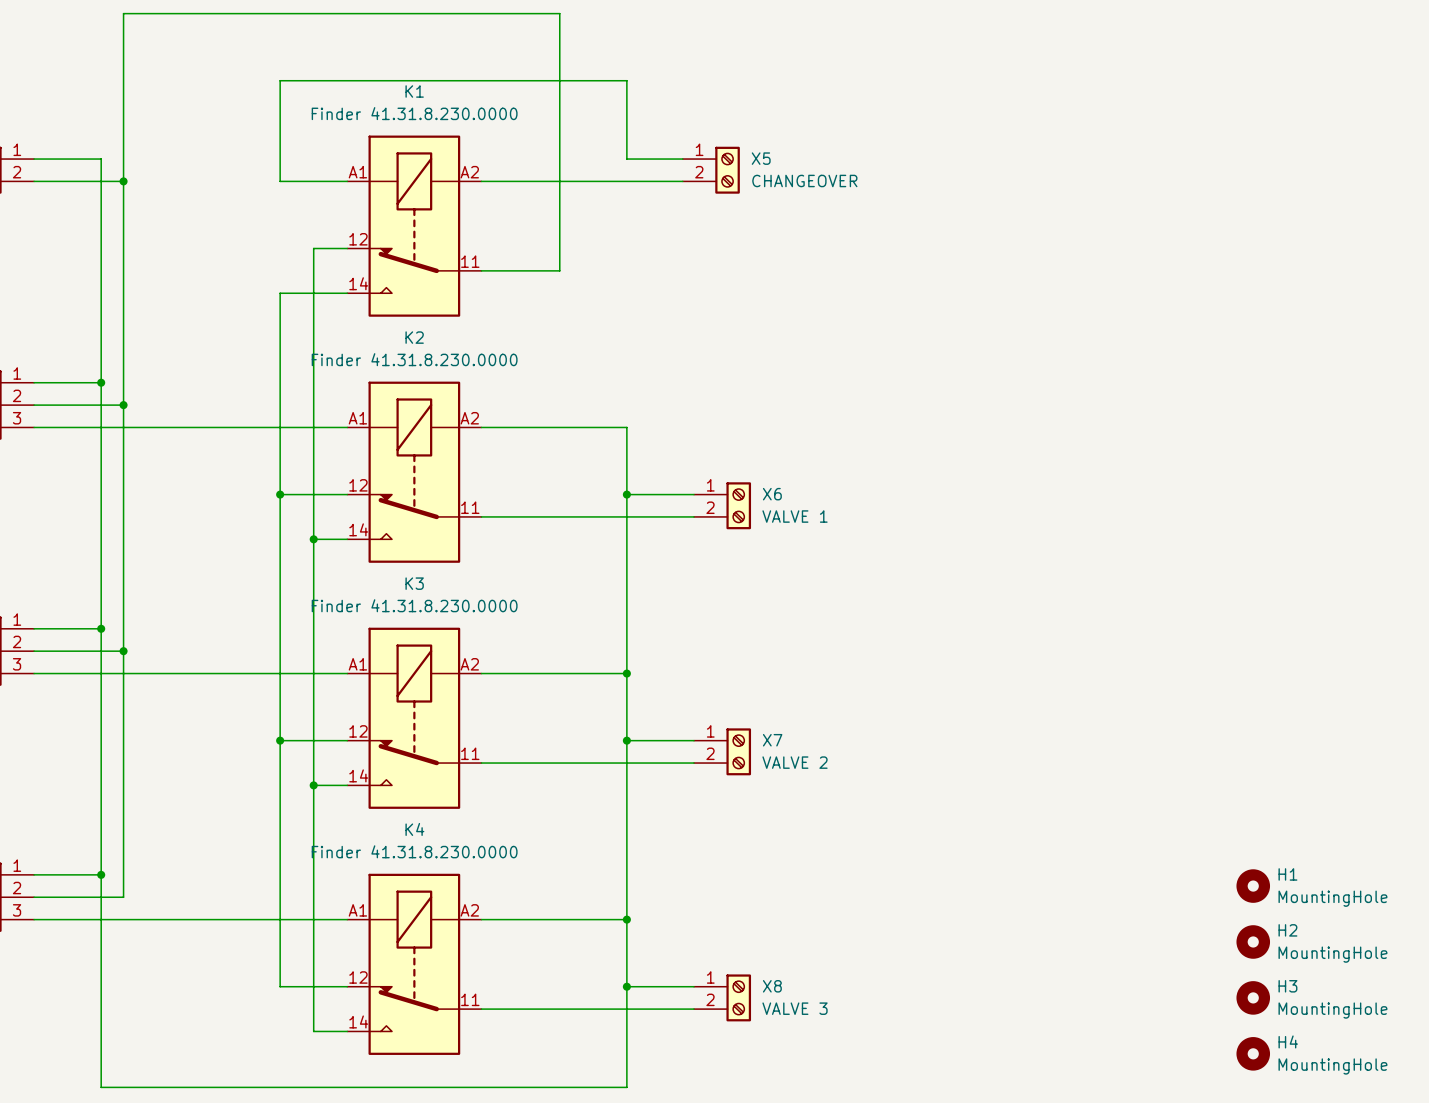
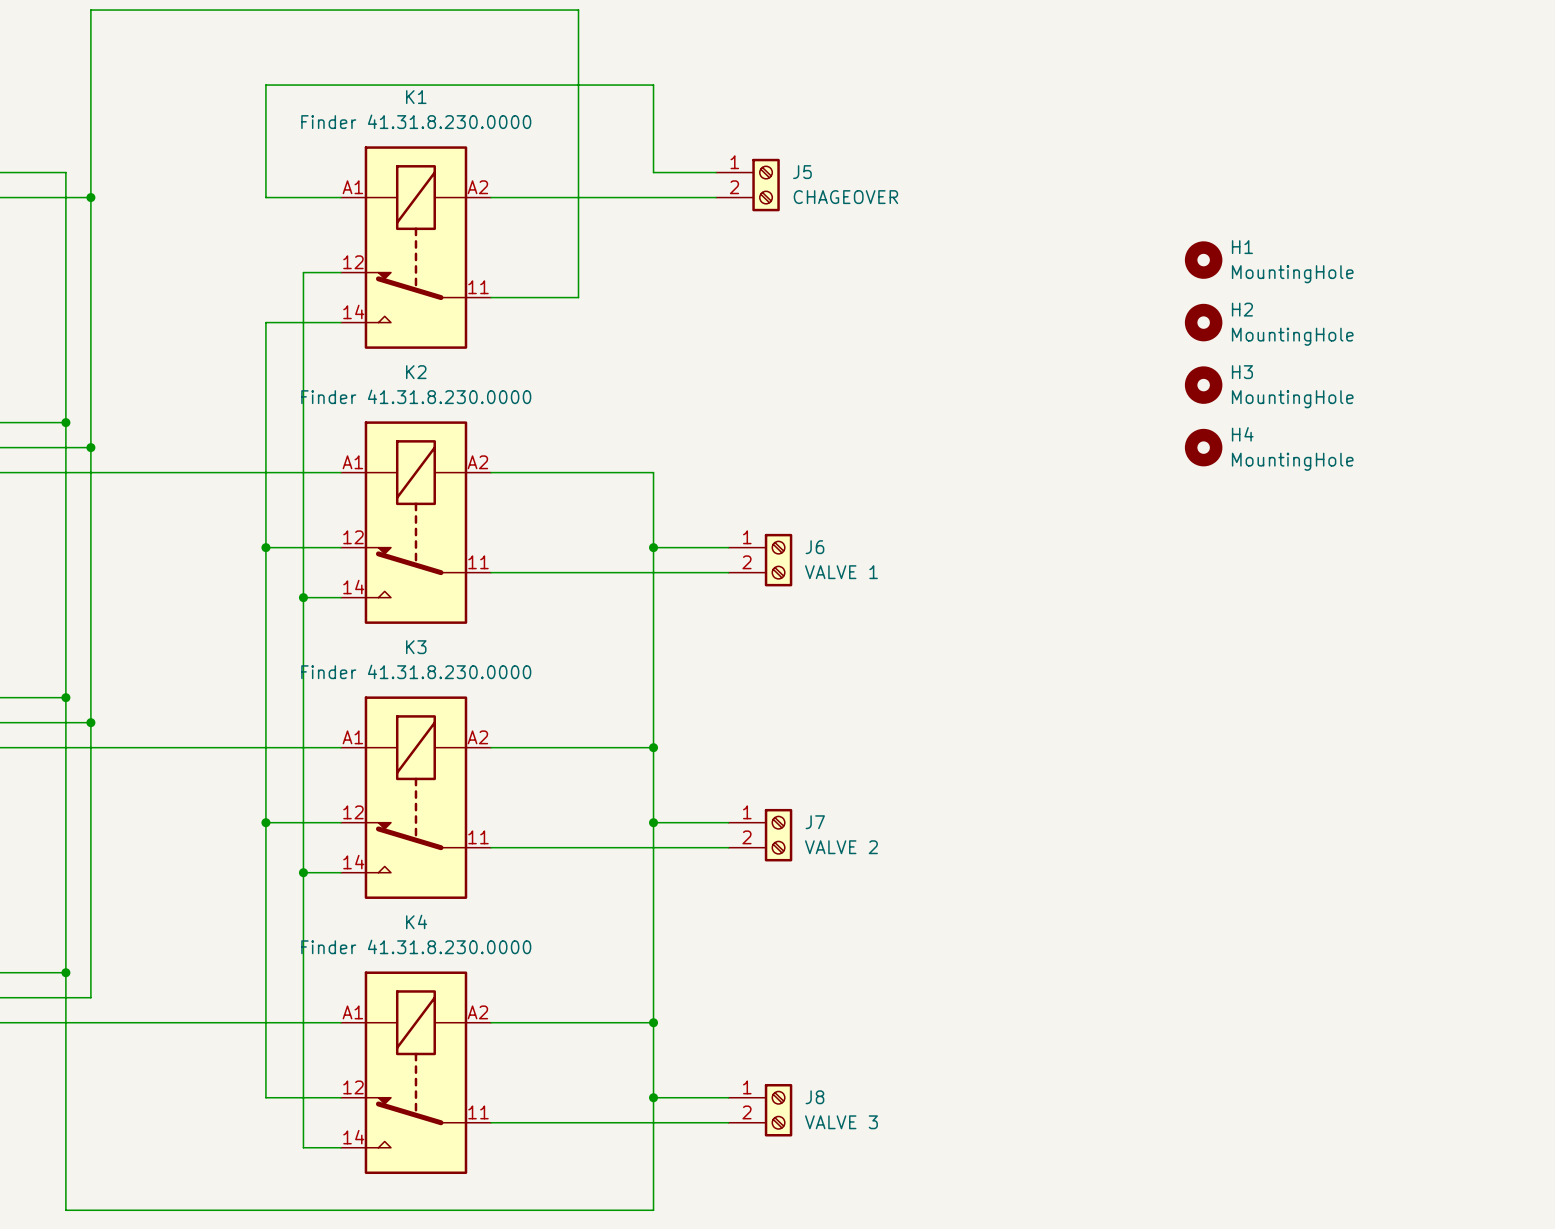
X5 name: X5 (761, 158) -> J5 (802, 172)
X5 value: CHANGEOVER (804, 180) -> CHAGEOVER (845, 197)
X6 name: X6 (772, 494) -> J6 (814, 547)
X7 name: X7 (772, 740) -> J7 (815, 822)
H1 position: (1253, 886) -> (1203, 260)
H2 position: (1253, 941) -> (1203, 322)
X8 name: X8 (772, 986) -> J8 (814, 1097)
H3 position: (1253, 997) -> (1203, 385)
H4 position: (1253, 1053) -> (1203, 447)

